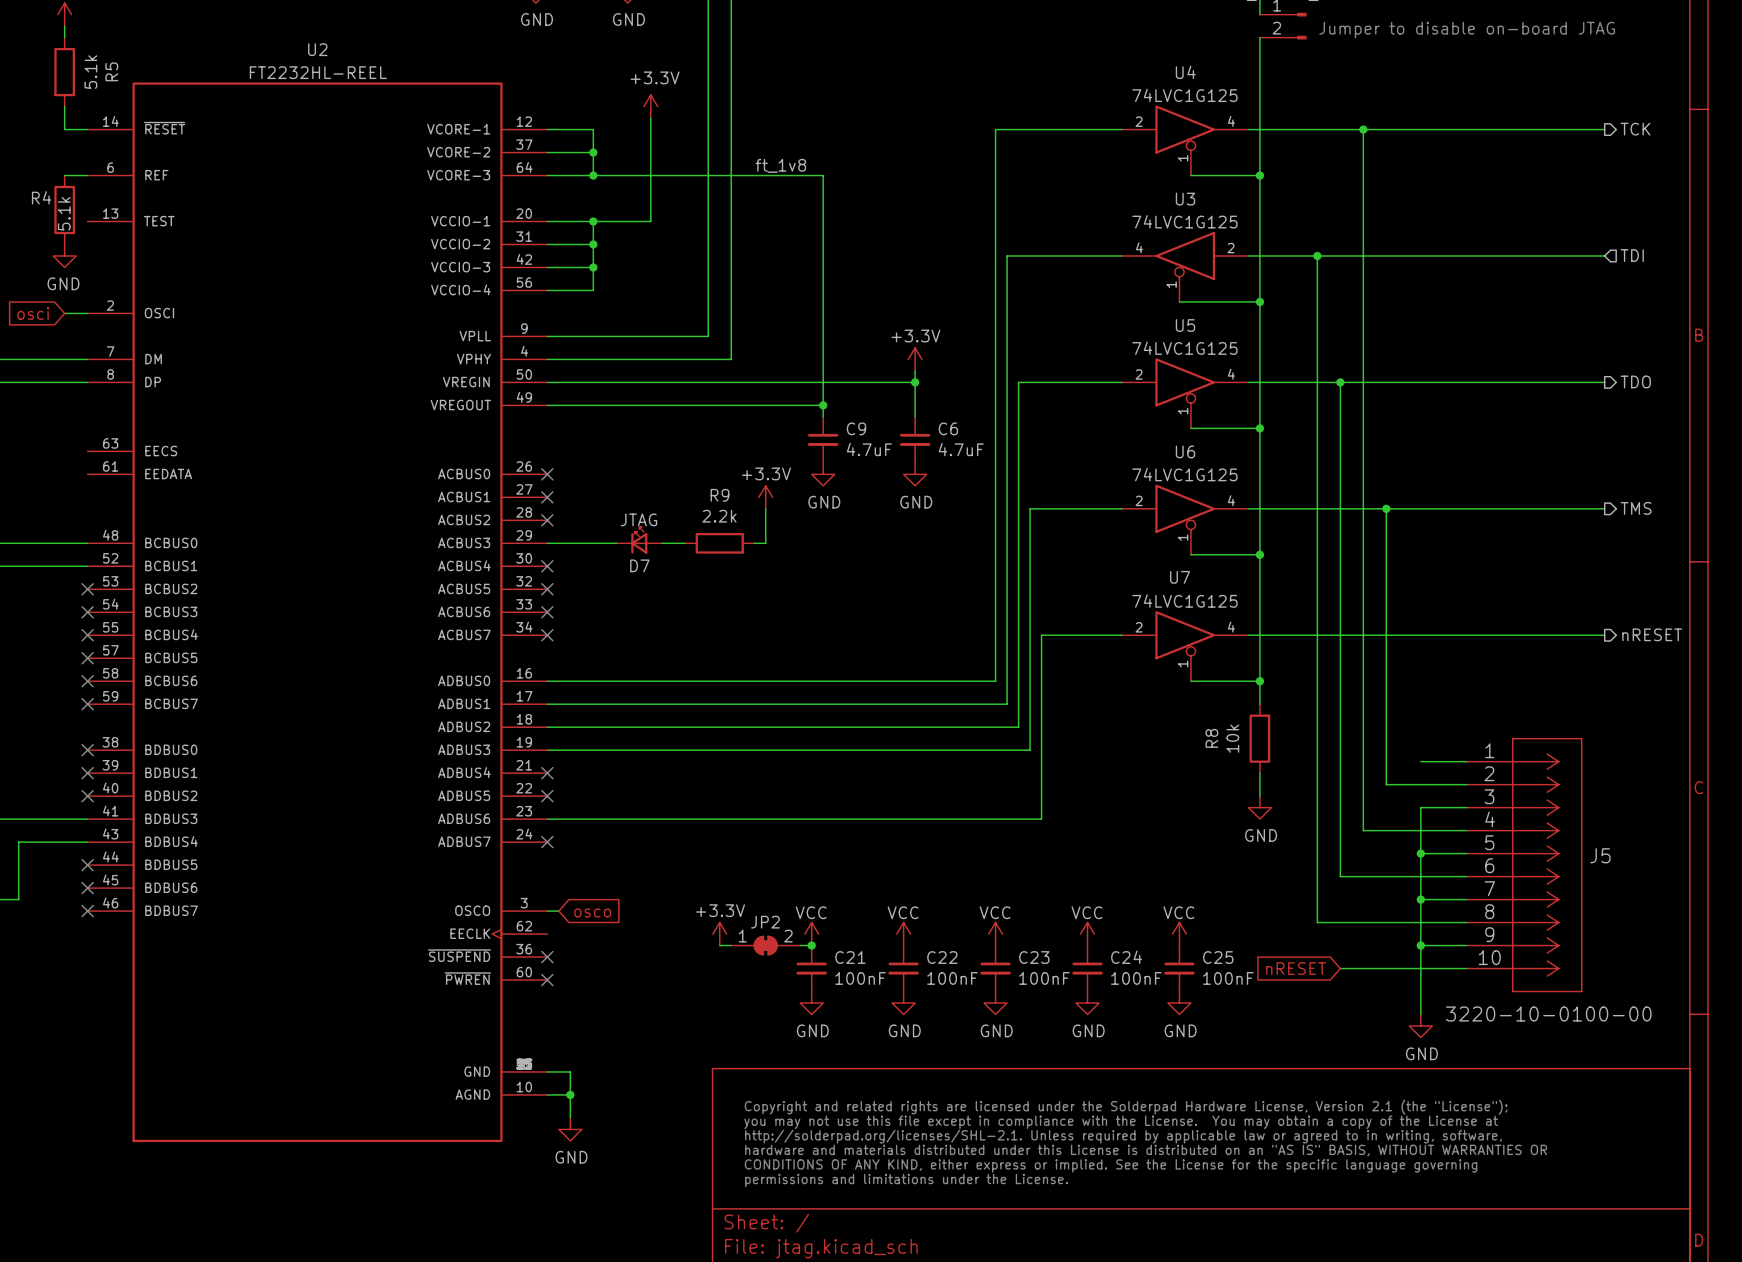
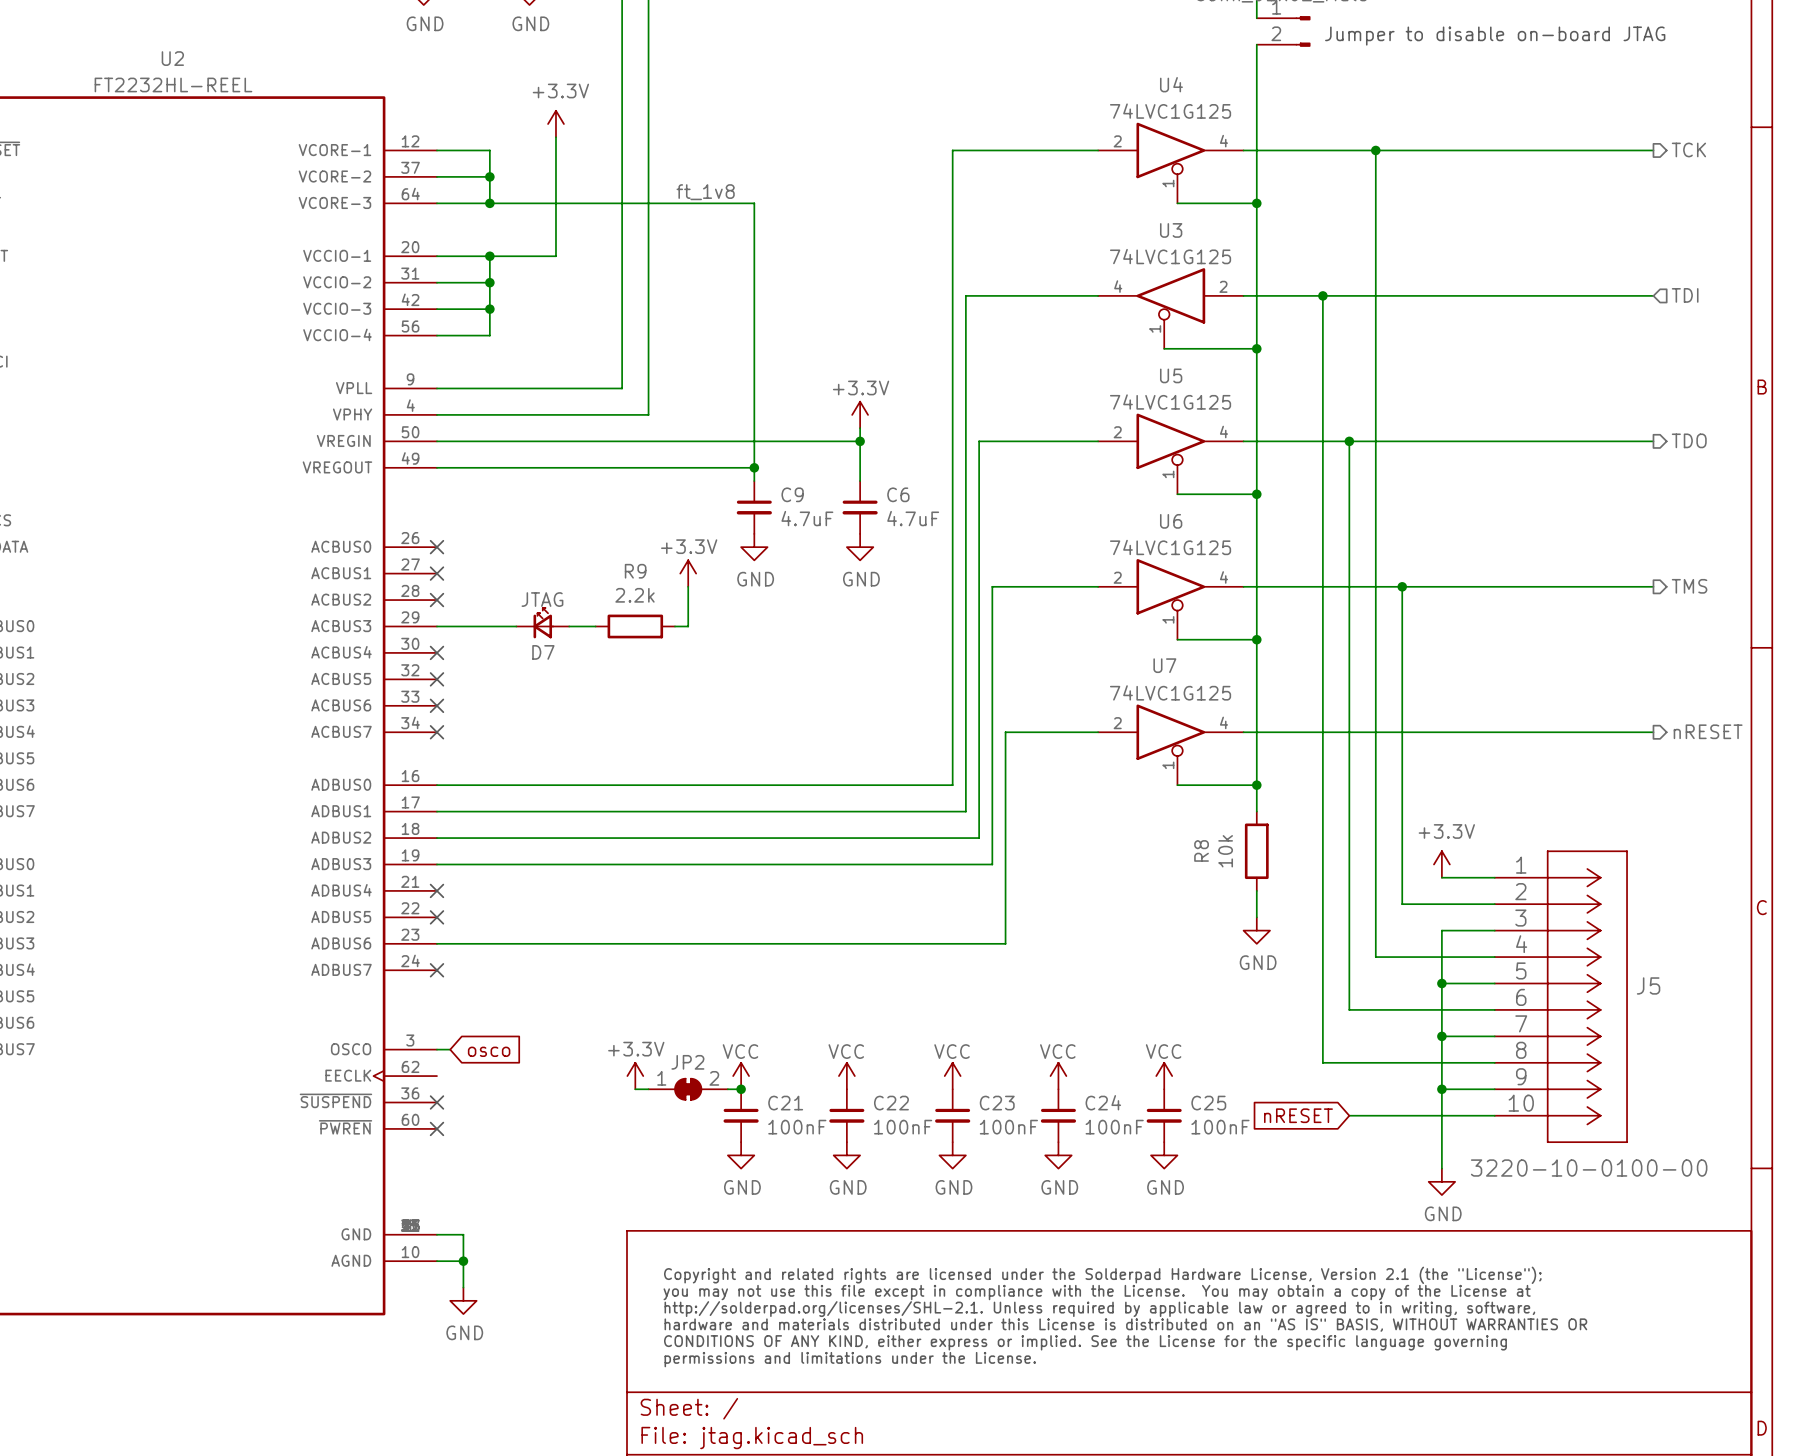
power symbol: none -> +3.3V (1441, 864)

